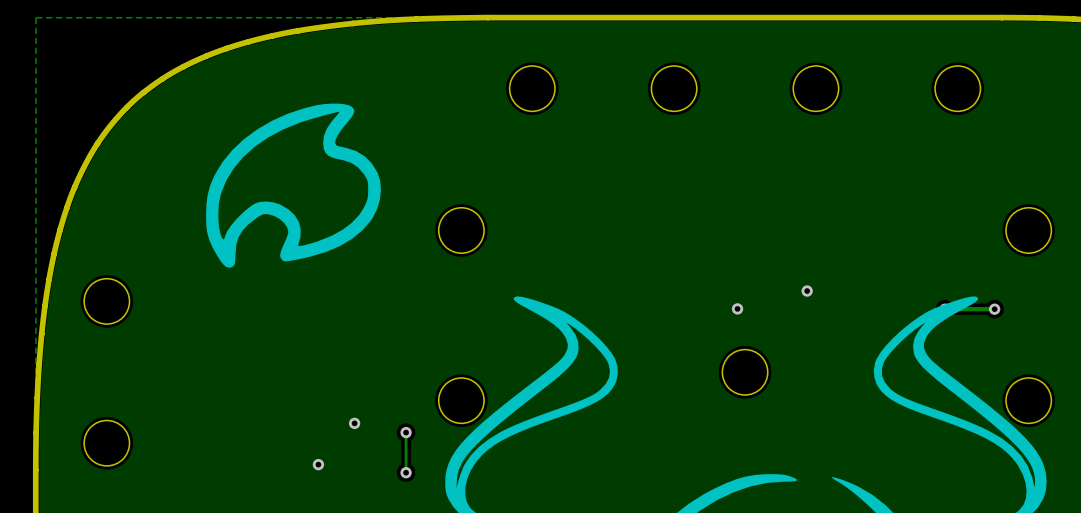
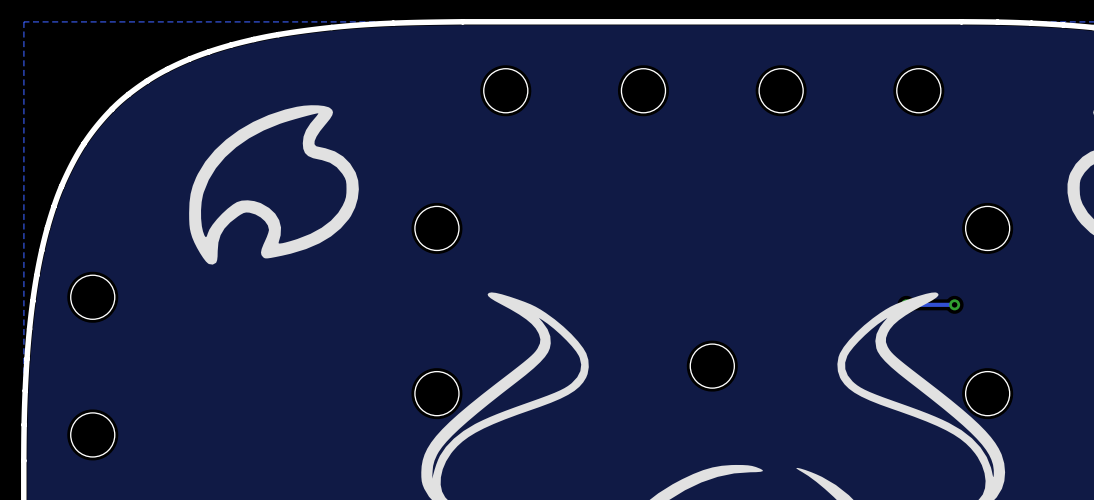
via: (807, 291) -> none
via: (737, 308) -> none
via: (354, 423) -> none
track: (406, 432) (406, 472) -> none
via: (406, 432) -> none
via: (318, 464) -> none
via: (406, 472) -> none

